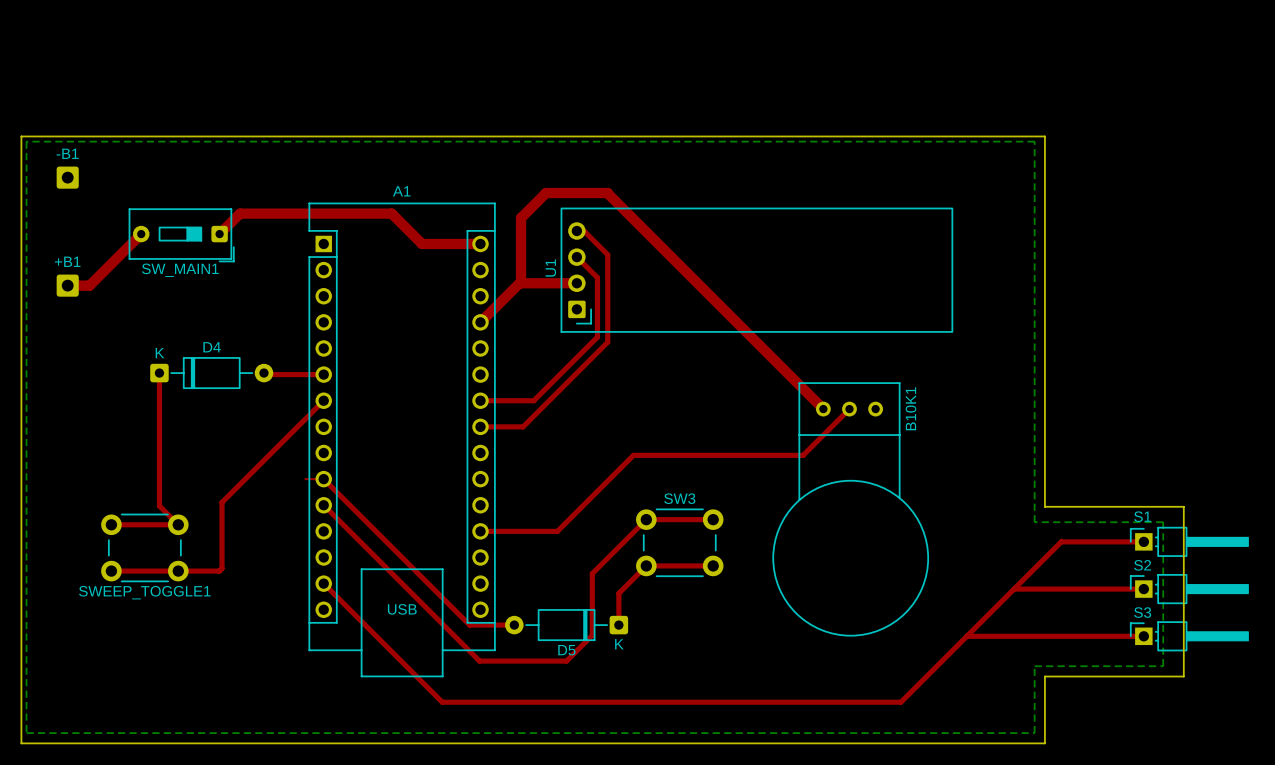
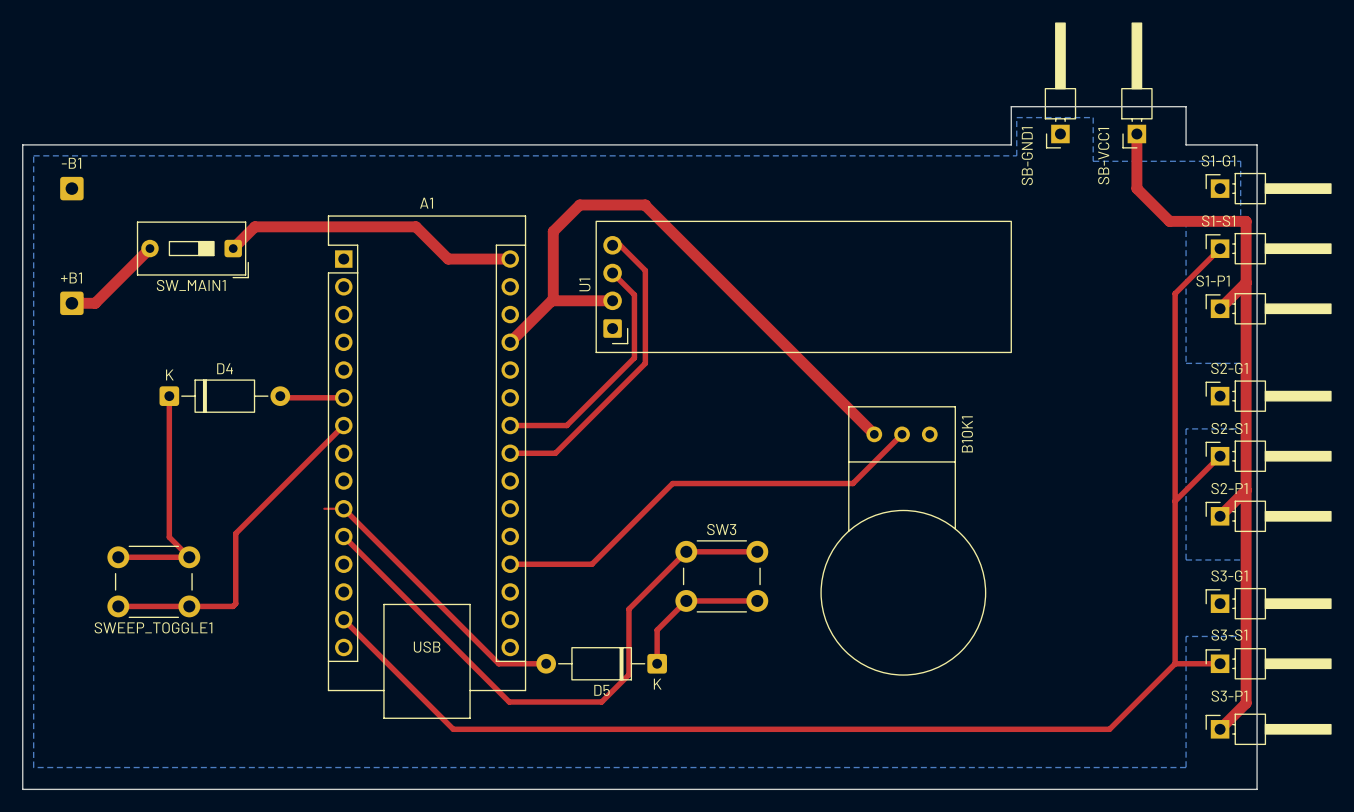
SB-GND1: none -> (1060, 85)
SB-VCC1: none -> (1136, 85)
top track: none -> (1136, 133) (1136, 188) (1169, 221) (1246, 221) (1246, 703) (1220, 729)
board edge: (952, 136) (1044, 136) (1044, 506) (1183, 506) -> (1011, 144) (1011, 106) (1186, 106) (1186, 144) (1257, 144) (1257, 538)
bottom zone outline: (26, 141) (26, 733) (1034, 733) (1034, 666) (1163, 666) (1163, 522) (1034, 522) (1034, 141) (26, 141) -> (1016, 117) (1016, 155) (33, 155) (33, 767) (1186, 767) (1186, 636) (1246, 636) (1246, 559) (1186, 559) (1186, 428) (1246, 428) (1246, 363) (1186, 363) (1186, 221) (1240, 221) (1240, 161) (1093, 161) (1093, 117) (1016, 117)
S1-G1: none -> (1268, 188)
top track: none -> (1220, 248) (1175, 293) (1175, 663)
S1-S1: none -> (1268, 248)
top track: none -> (1246, 282) (1220, 308)
S1-P1: none -> (1268, 308)
S2-G1: none -> (1268, 396)
top track: none -> (1220, 456) (1175, 501)
S2-S1: none -> (1268, 456)
top track: none -> (1246, 490) (1220, 516)
S2-P1: none -> (1268, 516)
top track: (1143, 541) (1061, 541) (900, 702) (442, 702) (426, 686) -> (1175, 663) (1109, 729) (453, 729)
S1: (1189, 541) -> none
S3-G1: none -> (1268, 603)
top track: (1014, 589) (1143, 589) -> none
S2: (1189, 589) -> none
top track: none -> (1175, 663) (1220, 663)
S3-S1: none -> (1268, 663)
top track: (966, 636) (1143, 636) -> none
S3: (1189, 636) -> none
board edge: (1183, 676) (1044, 676) (1044, 743) -> (1257, 718) (1257, 789) (1109, 789)
S3-P1: none -> (1268, 729)

